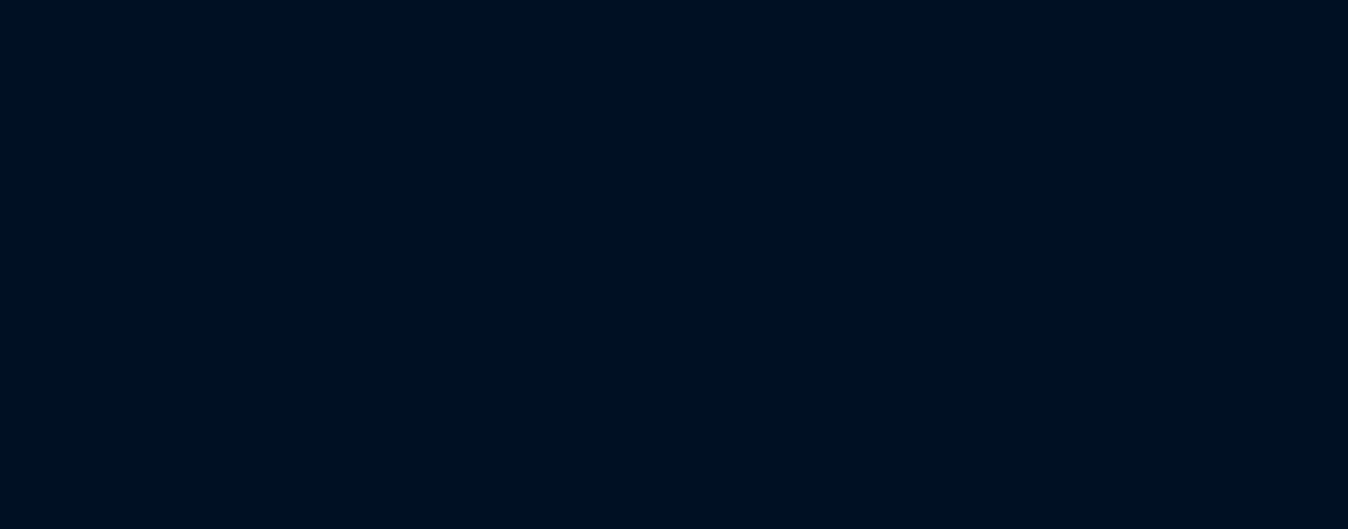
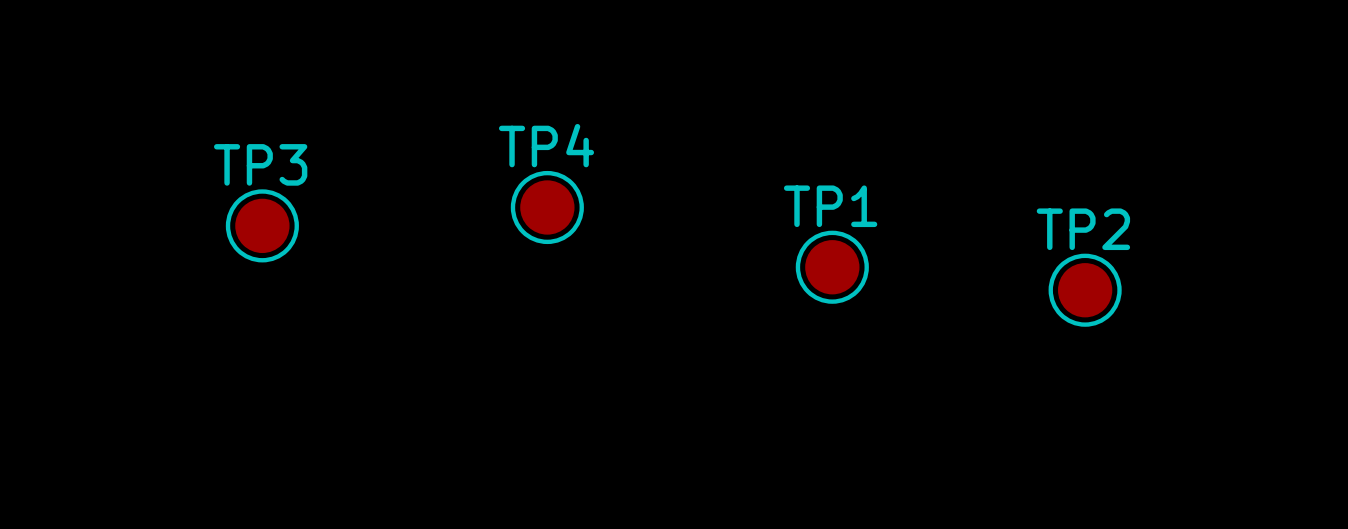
TP4: none -> (547, 207)
TP3: none -> (262, 225)
TP1: none -> (832, 267)
TP2: none -> (1085, 290)

